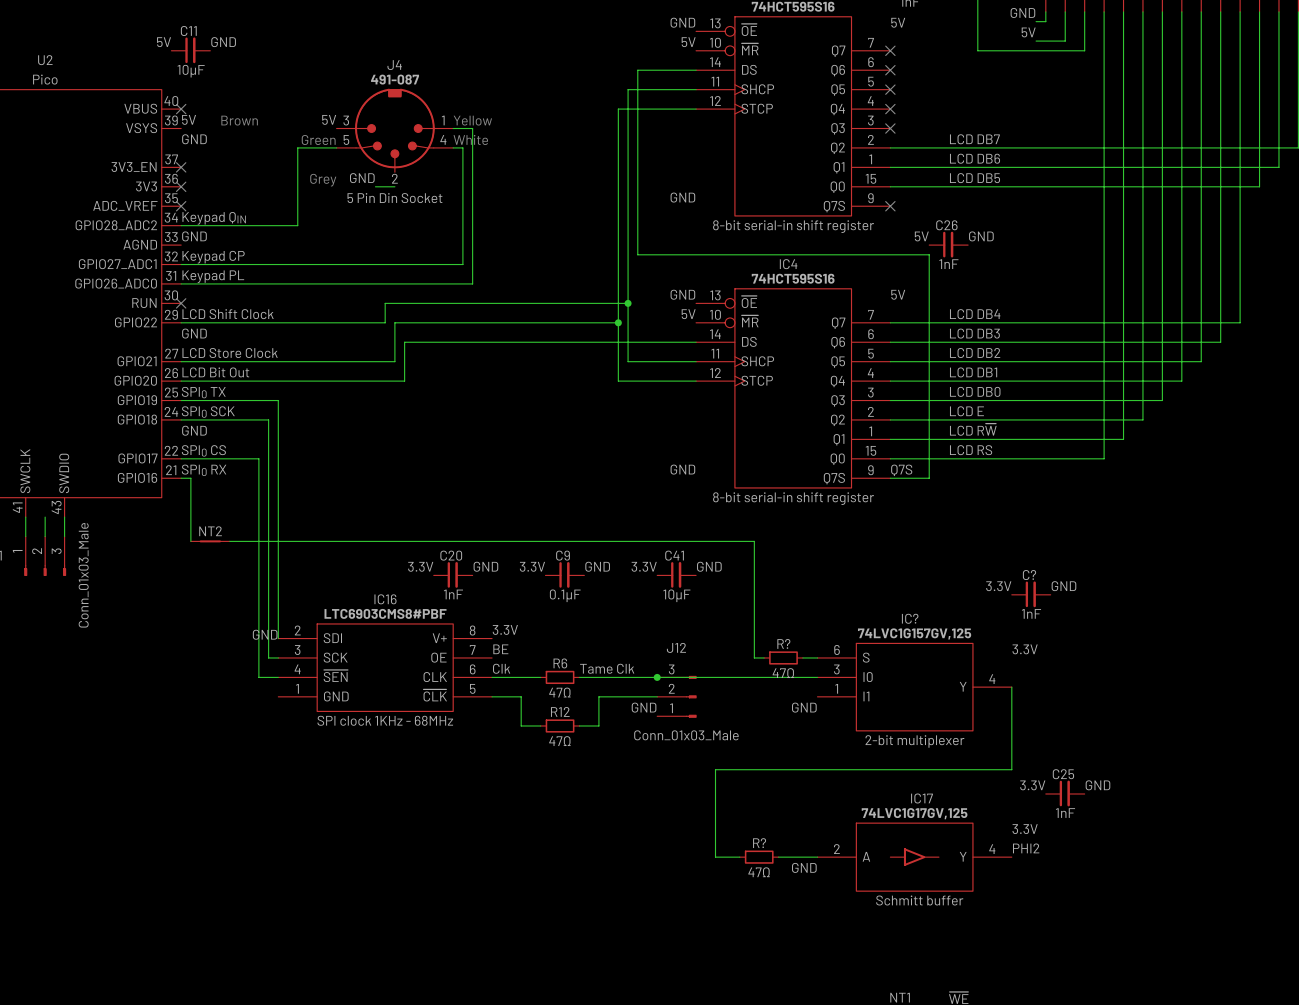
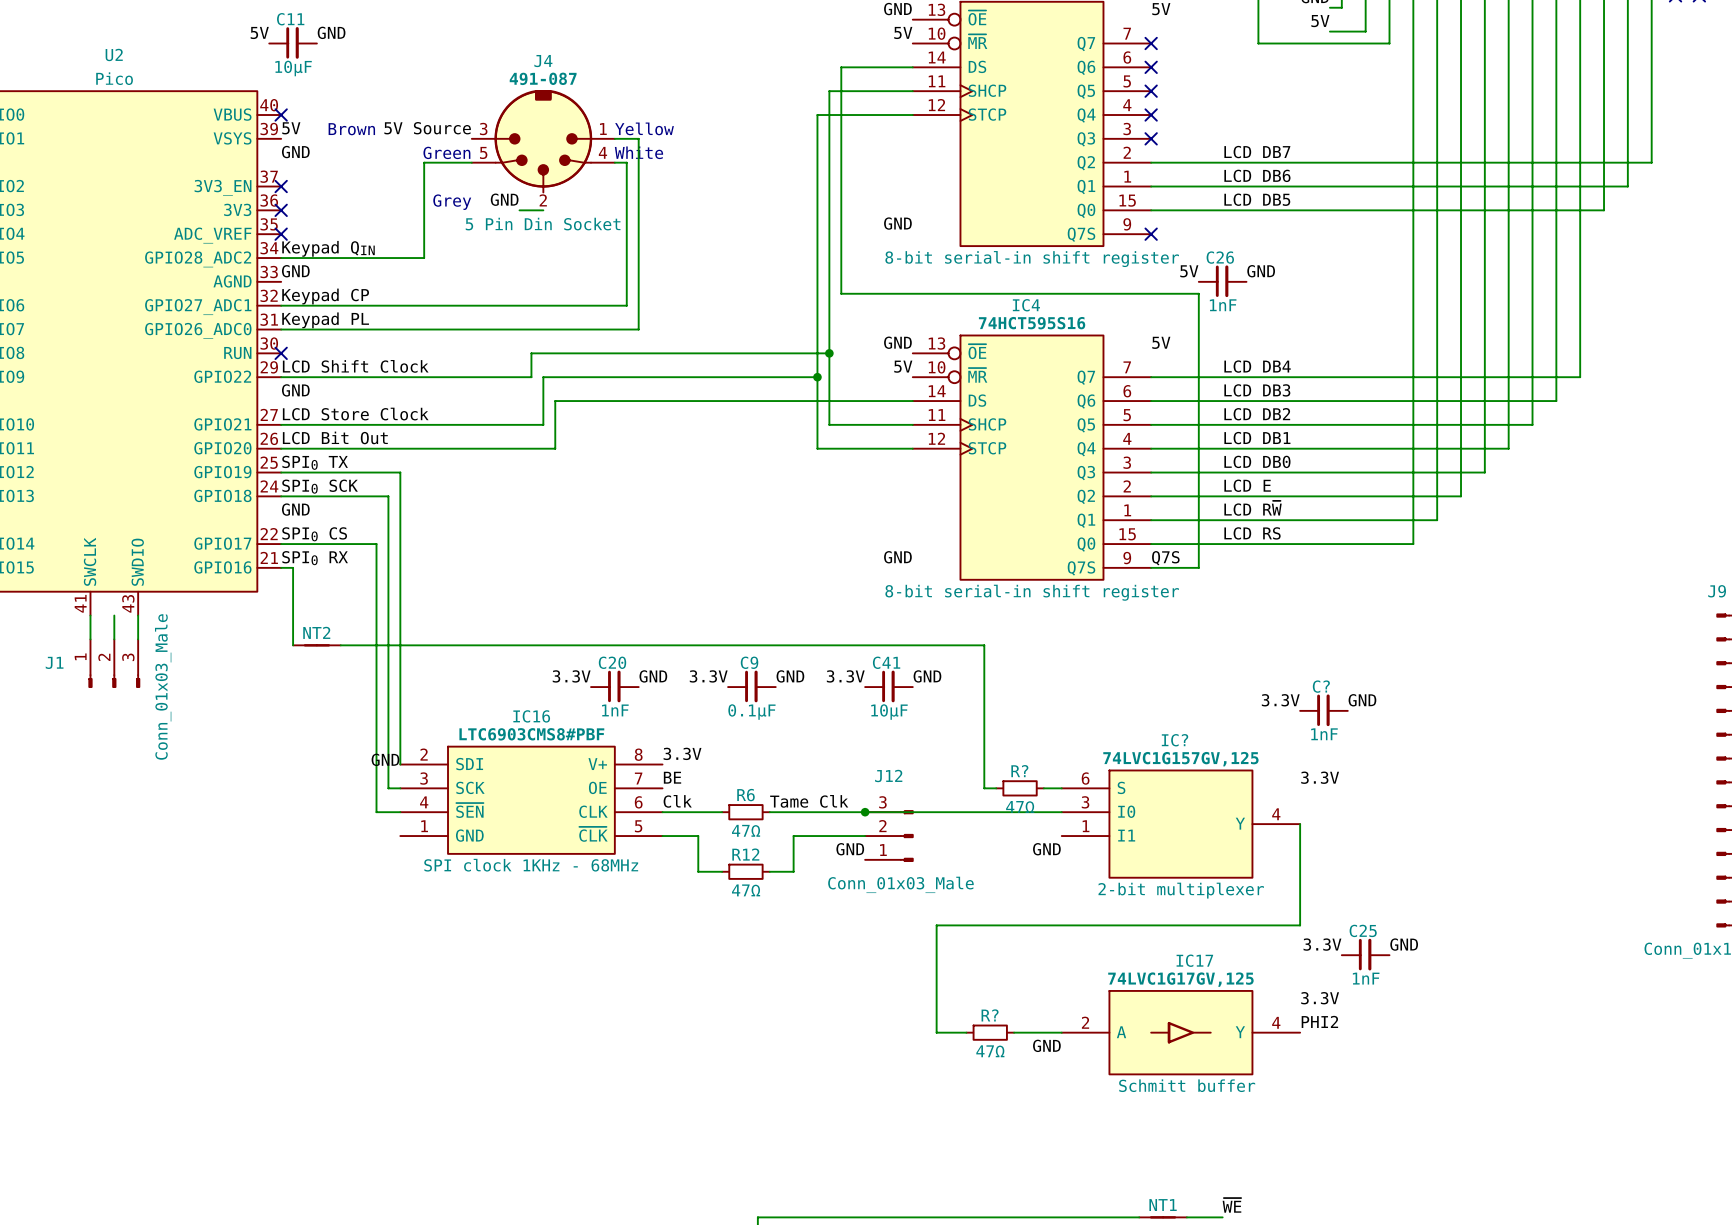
label: 5V (329, 119) -> 5V Source (427, 128)

